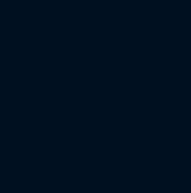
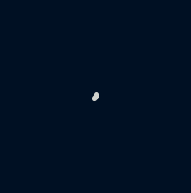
board edge: none -> (96, 94) (94, 98)

